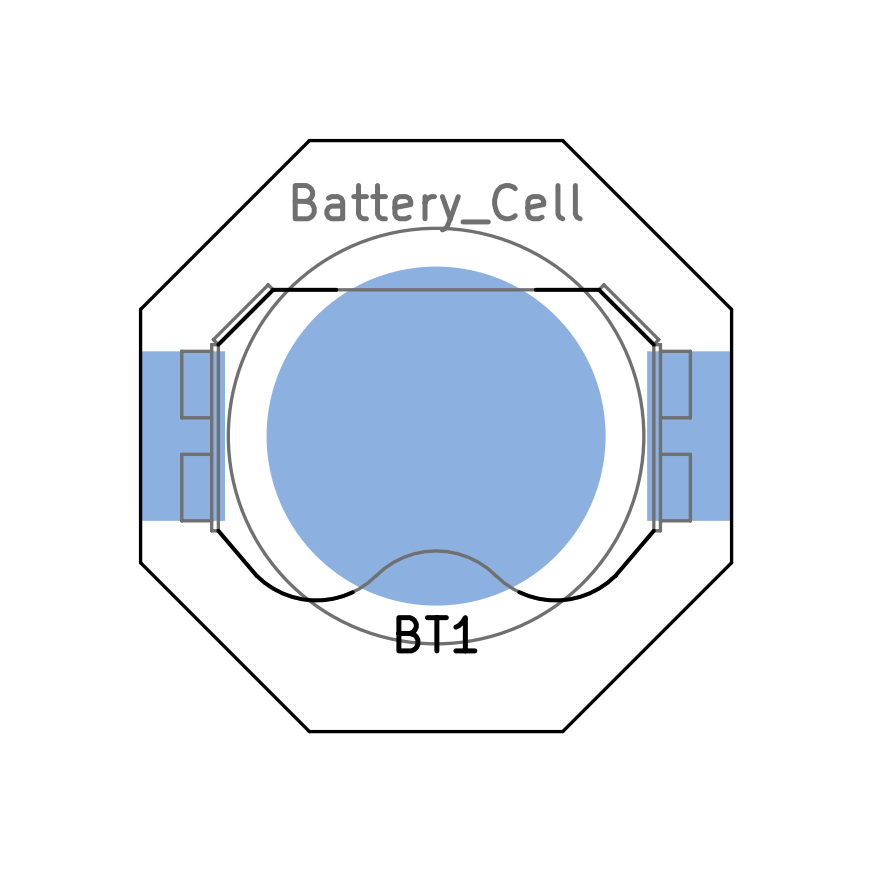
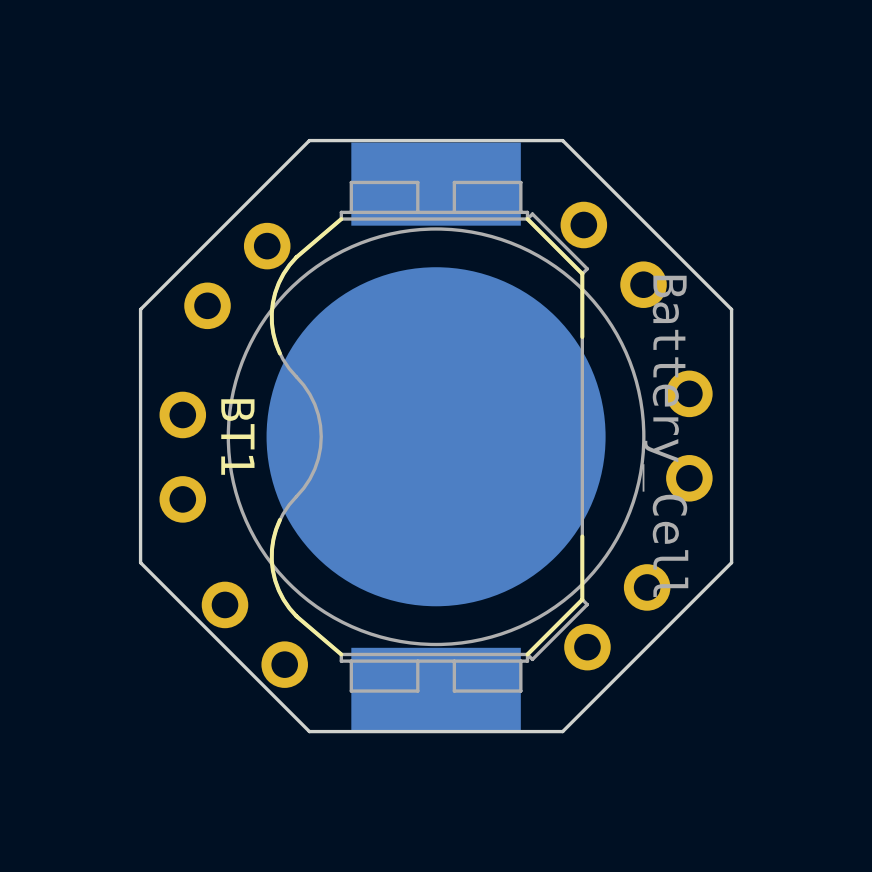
part: none -> (613, 254)
part: none -> (237, 275)
BT1 rotation: 0° (436, 436) -> 90° clockwise (436, 436)
part: none -> (689, 436)
part: none -> (182, 457)
part: none -> (617, 617)
part: none -> (254, 634)

